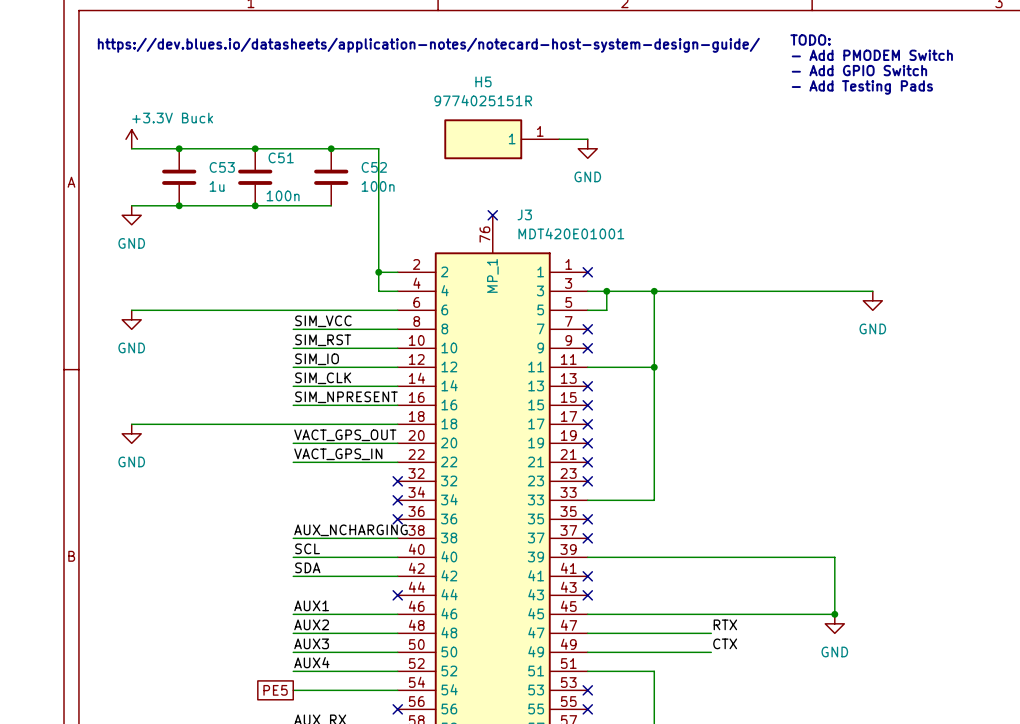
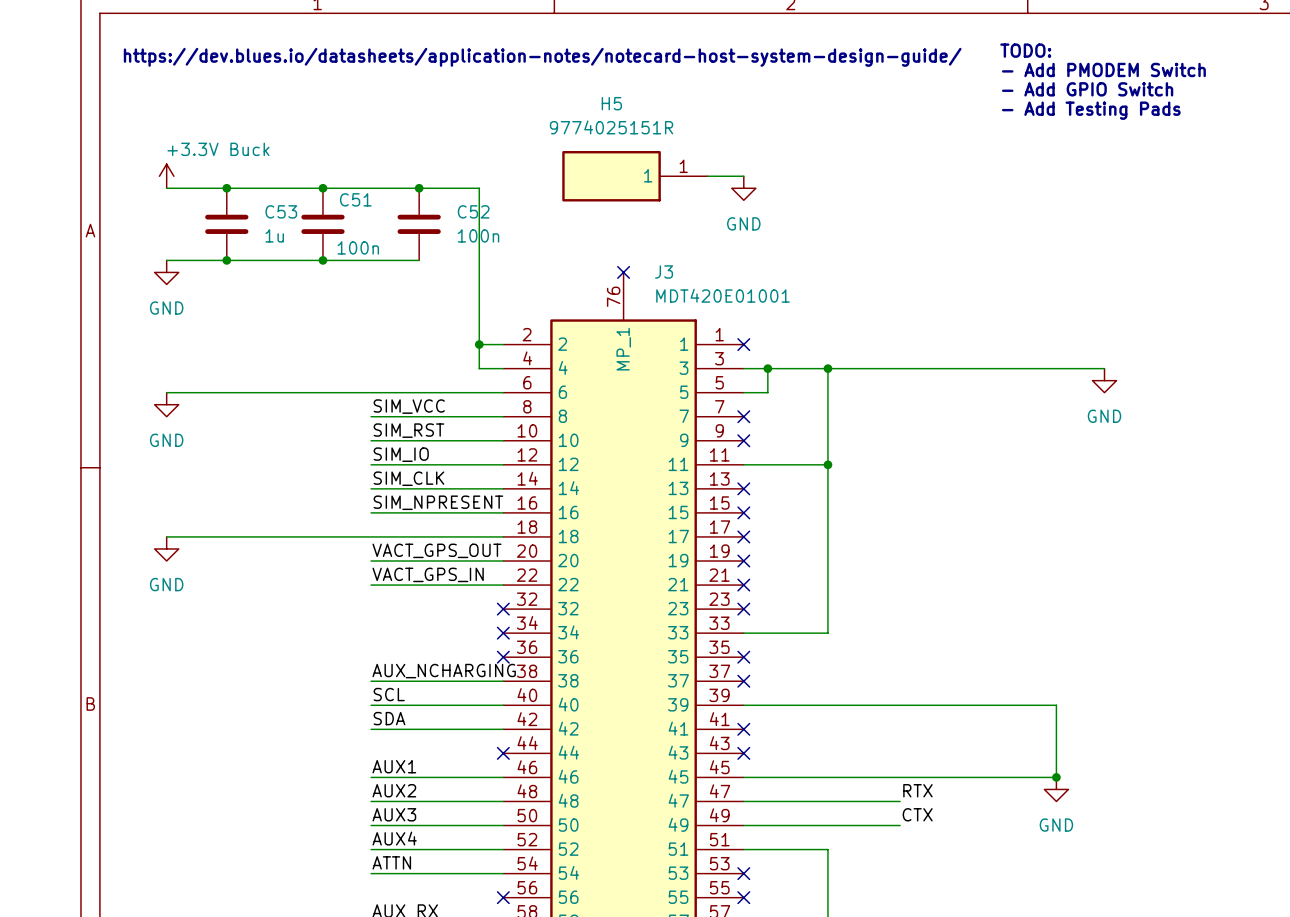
label: none -> ATTN (391, 862)
global label: PE5 (275, 690) -> none

